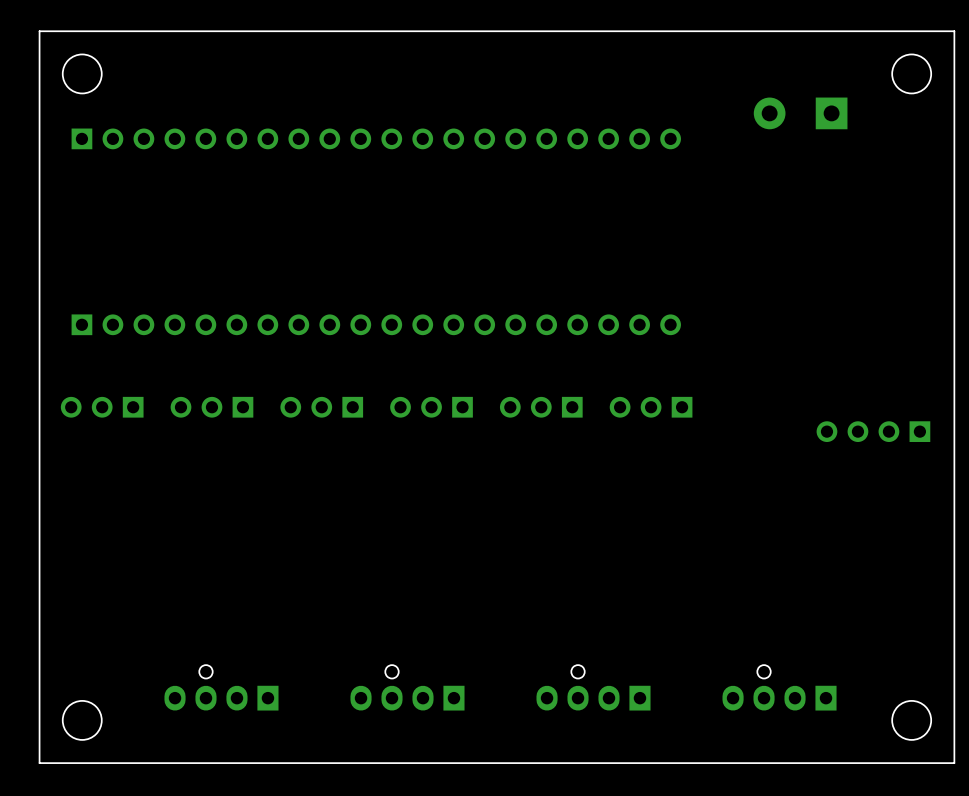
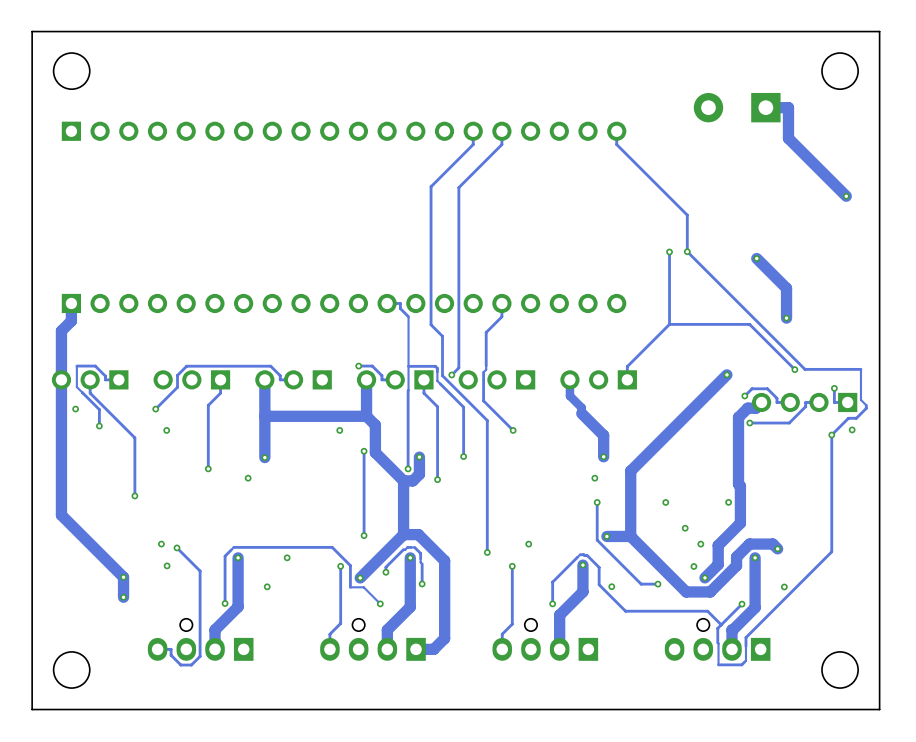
track: none -> (765, 107) (788, 107) (788, 138) (846, 196)
track: none -> (473, 131) (473, 144) (431, 186) (431, 324) (442, 336) (442, 375) (487, 420) (487, 552)
track: none -> (501, 131) (501, 144) (458, 187) (458, 367) (451, 374)
track: none -> (616, 131) (616, 144) (687, 215) (687, 251) (805, 369) (860, 369) (860, 399) (866, 405) (866, 408) (856, 418) (848, 418) (831, 435) (831, 551) (745, 637) (745, 660) (741, 664) (718, 664) (717, 628) (721, 624)
via: none -> (846, 196)
via: none -> (687, 251)
track: none -> (669, 251) (669, 324)
via: none -> (669, 251)
track: none -> (756, 258) (786, 288) (786, 318)
via: none -> (756, 258)
track: none -> (71, 303) (71, 321) (61, 330) (61, 515) (123, 577) (123, 597)
track: none -> (387, 303) (400, 303) (400, 308) (408, 316) (408, 468)
track: none -> (501, 303) (501, 316) (486, 332) (483, 400) (513, 430)
via: none -> (786, 318)
track: none -> (669, 324) (627, 366) (627, 379)
track: none -> (669, 324) (749, 324) (794, 369)
track: none -> (358, 366) (372, 366) (381, 375) (381, 379) (395, 379)
via: none -> (358, 366)
track: none -> (408, 366) (435, 366) (437, 368) (437, 381) (463, 407) (463, 456)
via: none -> (794, 369)
via: none -> (451, 374)
track: none -> (726, 374) (630, 471) (630, 536)
via: none -> (726, 374)
track: none -> (90, 379) (90, 393) (134, 437) (134, 495)
track: none -> (118, 379) (105, 379) (105, 376) (95, 366) (76, 366) (76, 387) (99, 409) (99, 426)
track: none -> (220, 379) (220, 393) (208, 405) (208, 468)
track: none -> (264, 379) (264, 457)
track: none -> (293, 379) (280, 379) (280, 375) (270, 366) (186, 366) (177, 375) (177, 387) (155, 409)
track: none -> (366, 379) (366, 416)
track: none -> (423, 379) (423, 393) (437, 406) (437, 479)
track: none -> (569, 379) (569, 395) (581, 407) (581, 413) (603, 435) (603, 456)
track: none -> (834, 388) (834, 402) (847, 402)
via: none -> (834, 388)
track: none -> (744, 396) (752, 388) (767, 388) (776, 398) (776, 402) (790, 402)
via: none -> (744, 396)
track: none -> (761, 402) (755, 408) (747, 408) (738, 417) (740, 523) (718, 545) (718, 564) (704, 577)
track: none -> (818, 402) (805, 402) (805, 406) (789, 423) (749, 423)
via: none -> (75, 409)
via: none -> (155, 409)
track: none -> (366, 416) (264, 416)
track: none -> (366, 416) (375, 425) (375, 452) (403, 480)
via: none -> (749, 423)
via: none -> (99, 426)
via: none -> (166, 430)
via: none -> (339, 430)
via: none -> (513, 430)
via: none -> (852, 429)
via: none -> (831, 435)
track: none -> (364, 451) (364, 535)
via: none -> (364, 451)
track: none -> (419, 457) (419, 474) (412, 480) (403, 480)
via: none -> (419, 457)
via: none -> (463, 456)
via: none -> (603, 456)
via: none -> (264, 457)
via: none -> (208, 468)
via: none -> (408, 468)
via: none -> (248, 478)
via: none -> (594, 478)
via: none -> (437, 479)
track: none -> (403, 480) (403, 534)
via: none -> (134, 495)
track: none -> (597, 502) (597, 540) (641, 584) (657, 584)
via: none -> (597, 502)
via: none -> (665, 502)
via: none -> (728, 502)
via: none -> (685, 528)
track: none -> (403, 534) (418, 534) (444, 560) (444, 638) (433, 649) (416, 649)
track: none -> (403, 534) (360, 577)
via: none -> (364, 535)
via: none -> (606, 536)
track: none -> (630, 536) (606, 536)
track: none -> (630, 536) (686, 591) (710, 591) (736, 565) (736, 557) (749, 544) (772, 544) (777, 548)
via: none -> (161, 544)
via: none -> (528, 544)
via: none -> (700, 544)
track: none -> (176, 547) (200, 571) (200, 656) (191, 665) (180, 665) (171, 655) (171, 649) (157, 649)
via: none -> (176, 547)
via: none -> (777, 548)
via: none -> (487, 552)
track: none -> (577, 557) (580, 554) (586, 555) (599, 567) (599, 584) (625, 611) (707, 611) (721, 624)
track: none -> (577, 557) (552, 582) (552, 603)
track: none -> (238, 557) (238, 606) (215, 629) (215, 649)
via: none -> (238, 557)
via: none -> (287, 557)
track: none -> (410, 557) (410, 607) (387, 629) (387, 649)
via: none -> (410, 557)
track: none -> (755, 557) (755, 607) (731, 629) (731, 649)
via: none -> (755, 557)
track: none -> (582, 565) (582, 591) (559, 615) (559, 649)
via: none -> (582, 565)
via: none -> (167, 565)
track: none -> (340, 566) (340, 623) (329, 634) (329, 649)
via: none -> (340, 566)
track: none -> (512, 566) (512, 624) (502, 634) (502, 649)
via: none -> (512, 566)
via: none -> (693, 566)
track: none -> (385, 572) (385, 567) (403, 549) (414, 547) (420, 553) (422, 584)
via: none -> (385, 572)
via: none -> (123, 577)
via: none -> (360, 577)
via: none -> (704, 577)
via: none -> (422, 584)
via: none -> (657, 584)
via: none -> (267, 586)
via: none -> (611, 586)
via: none -> (784, 586)
via: none -> (123, 597)
track: none -> (225, 603) (225, 556) (233, 547) (332, 547) (350, 565) (350, 587) (363, 587) (380, 603)
via: none -> (225, 603)
via: none -> (380, 603)
via: none -> (552, 603)
track: none -> (742, 604) (721, 624)
via: none -> (742, 604)

